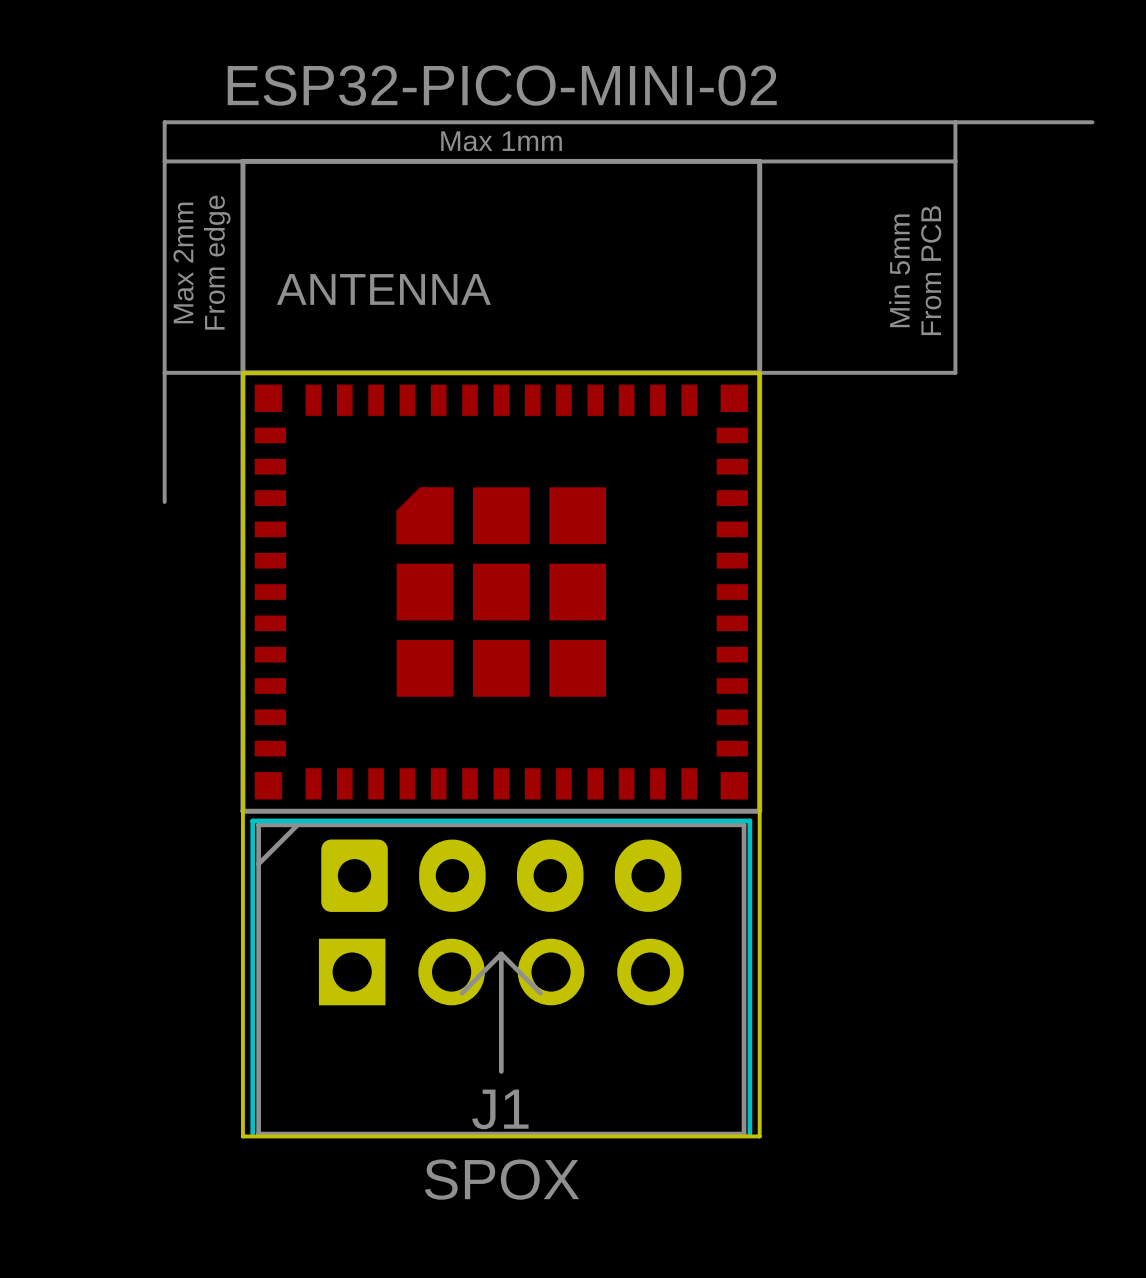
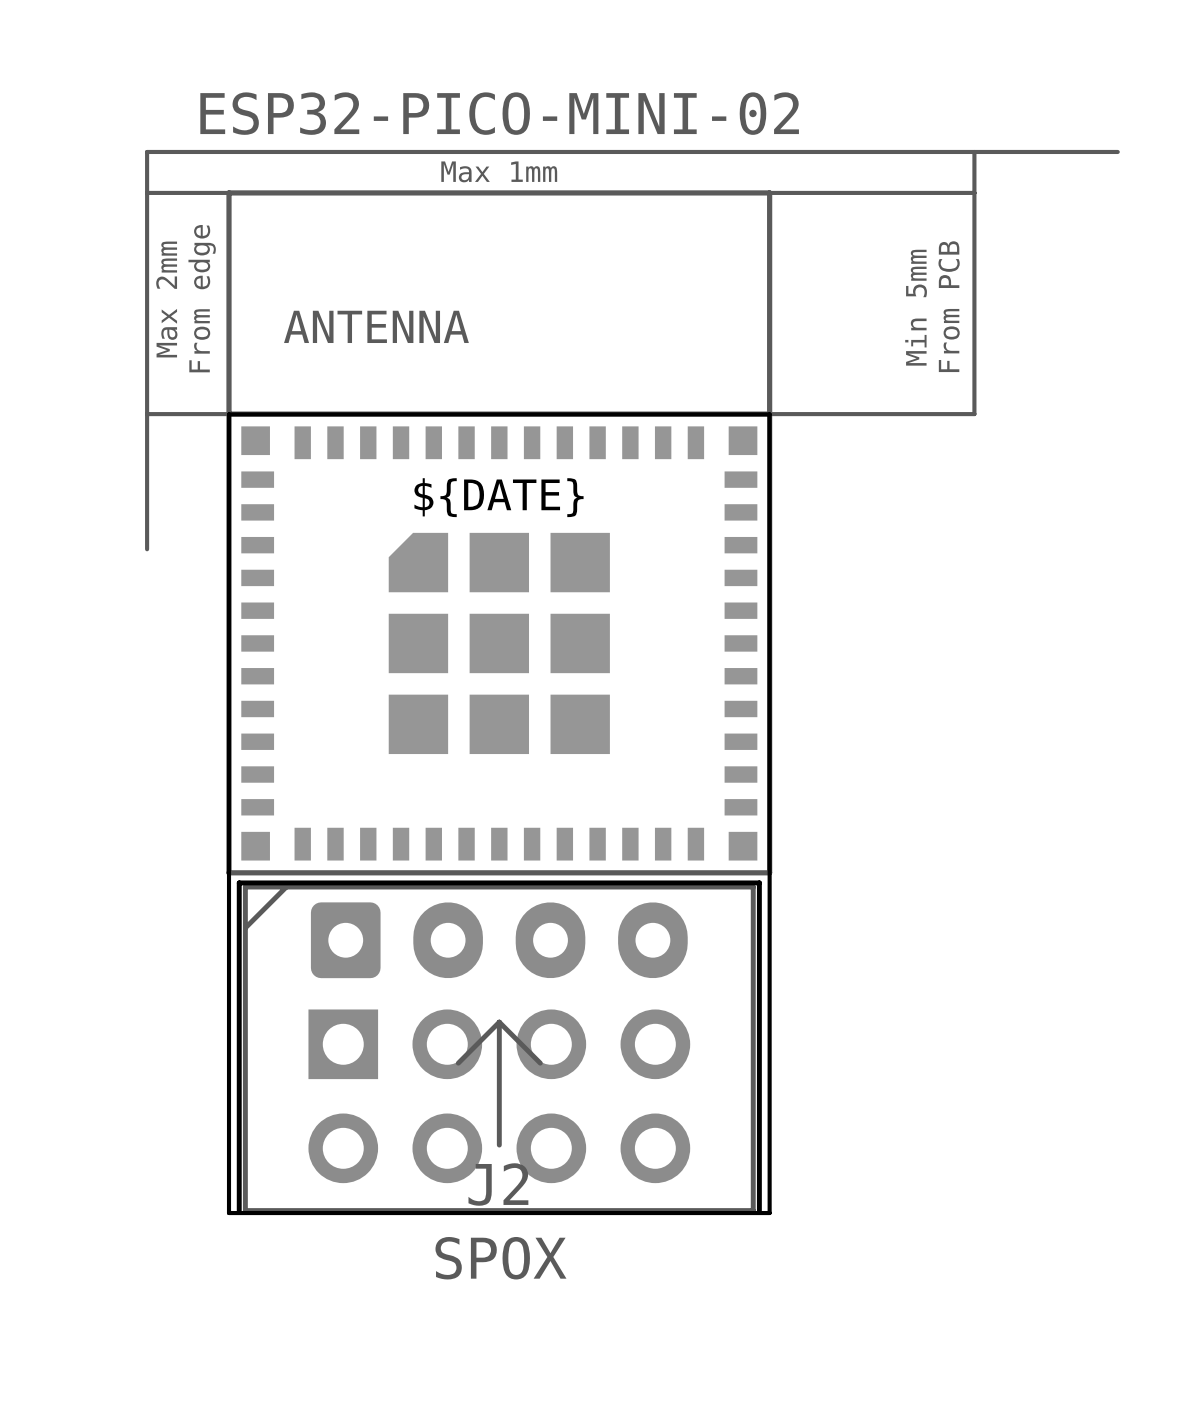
part footprint: [162, 120, 1095, 814] -> [145, 149, 1120, 876]
part: (501, 972) -> none
part: none -> (499, 1096)
J1 name: J1 (500, 1109) -> J2 (498, 1184)

